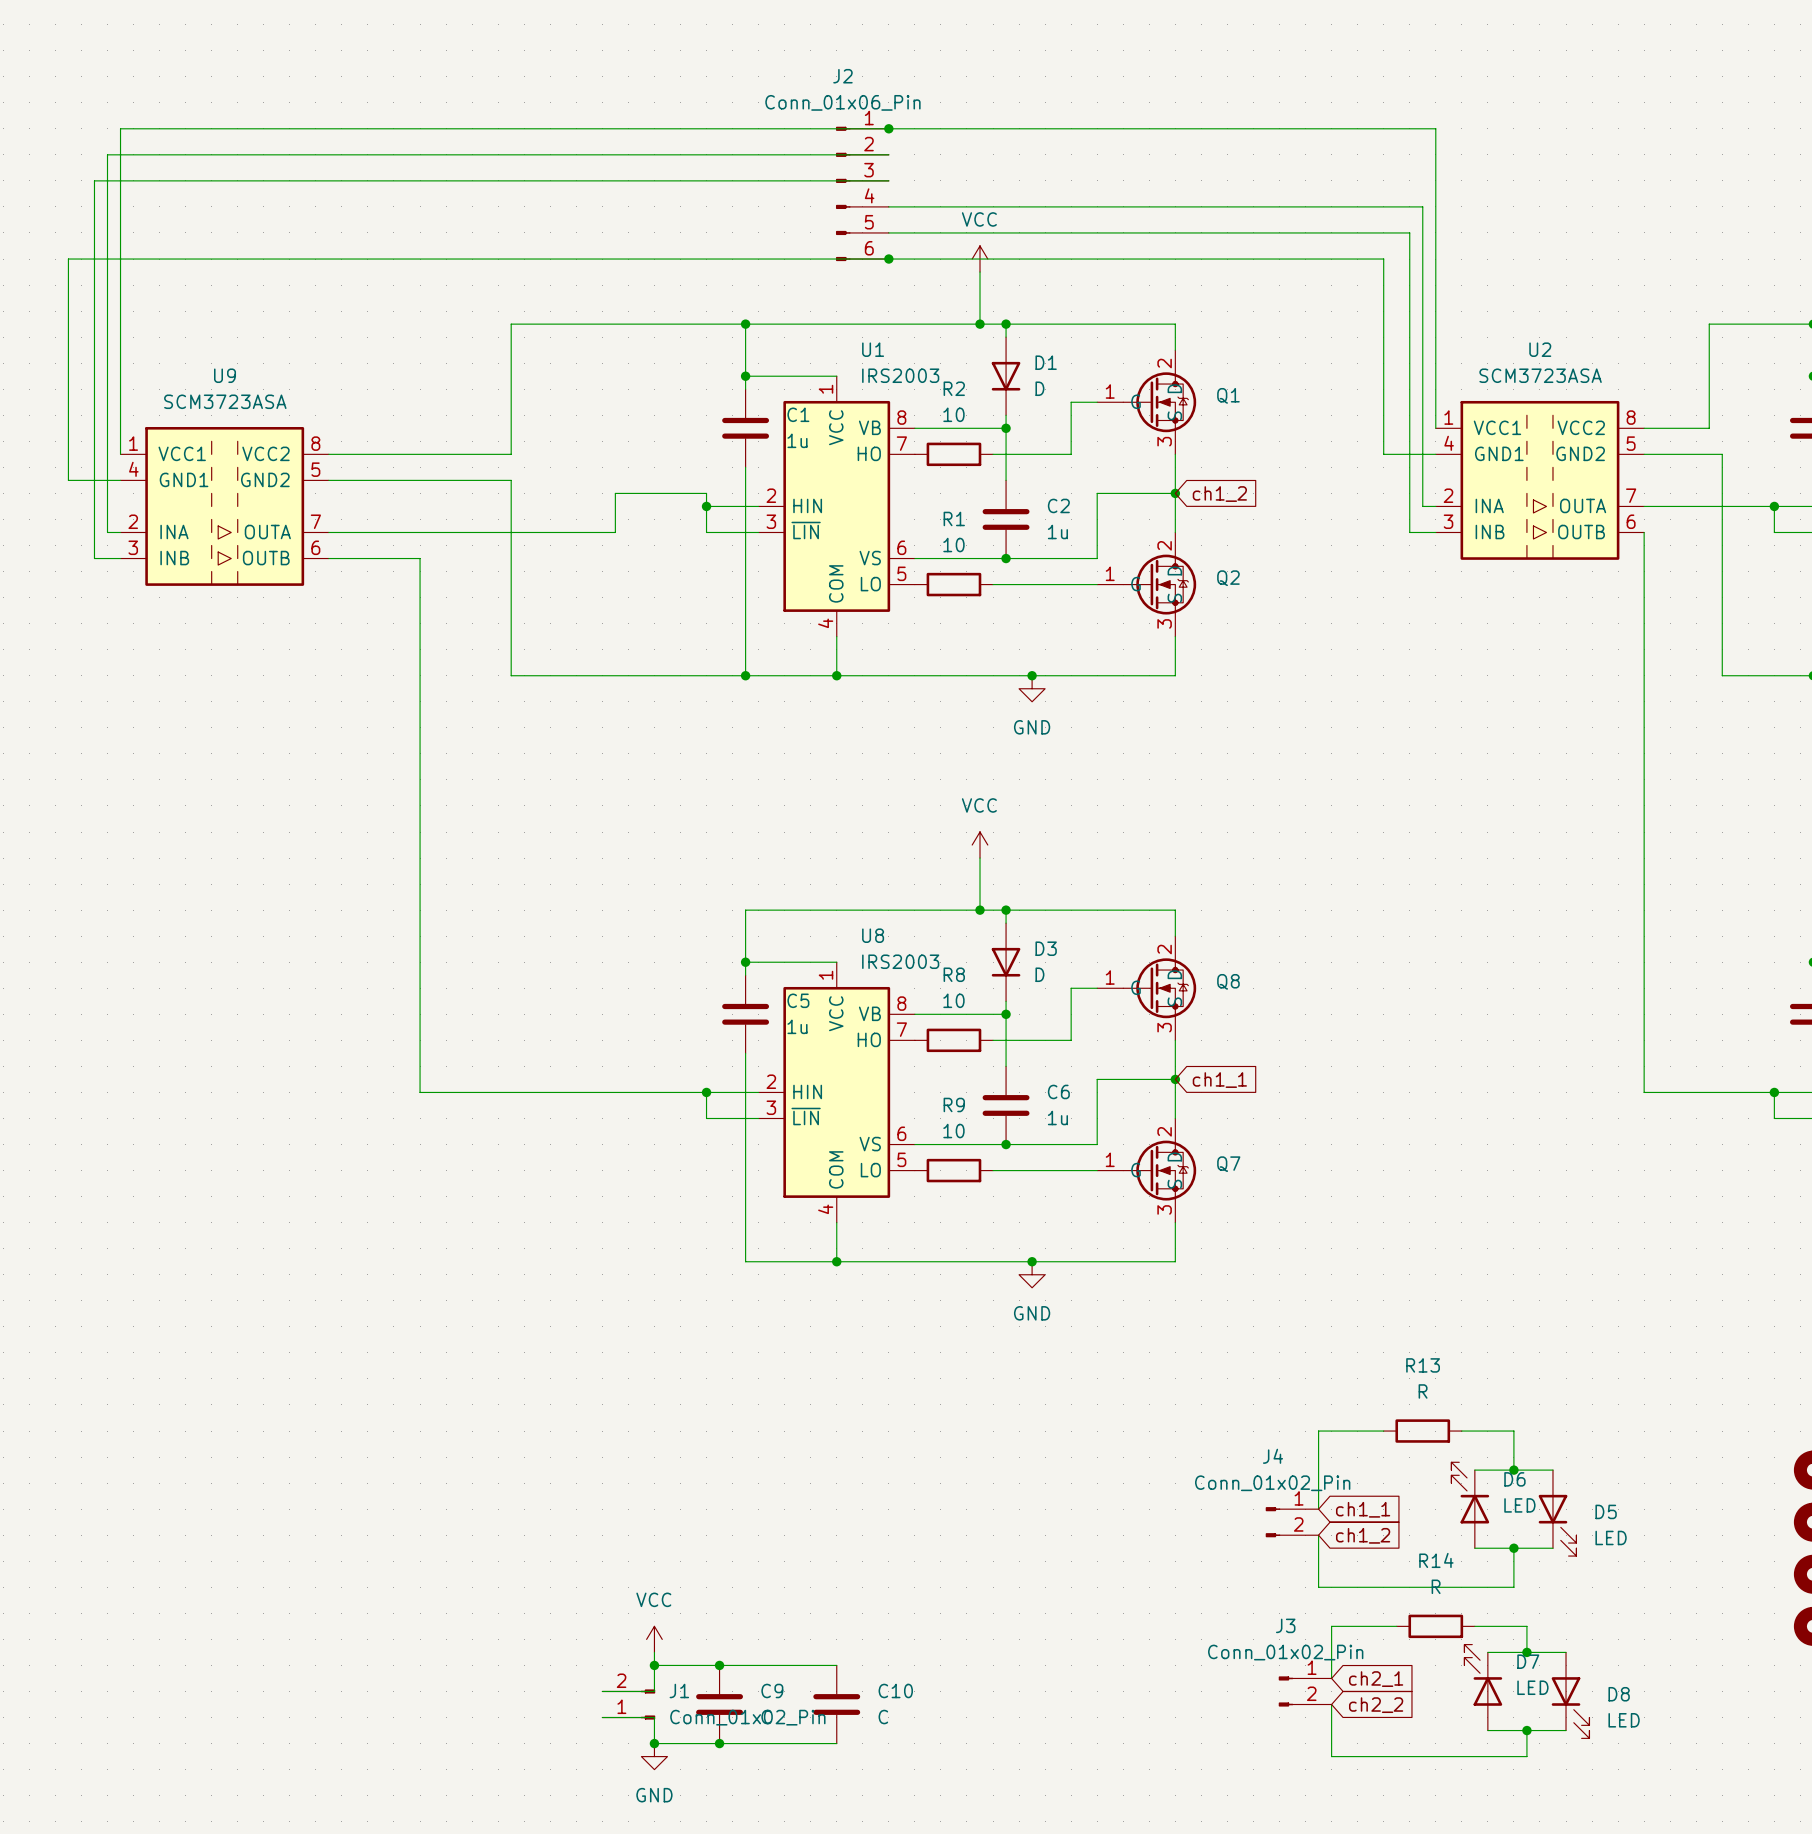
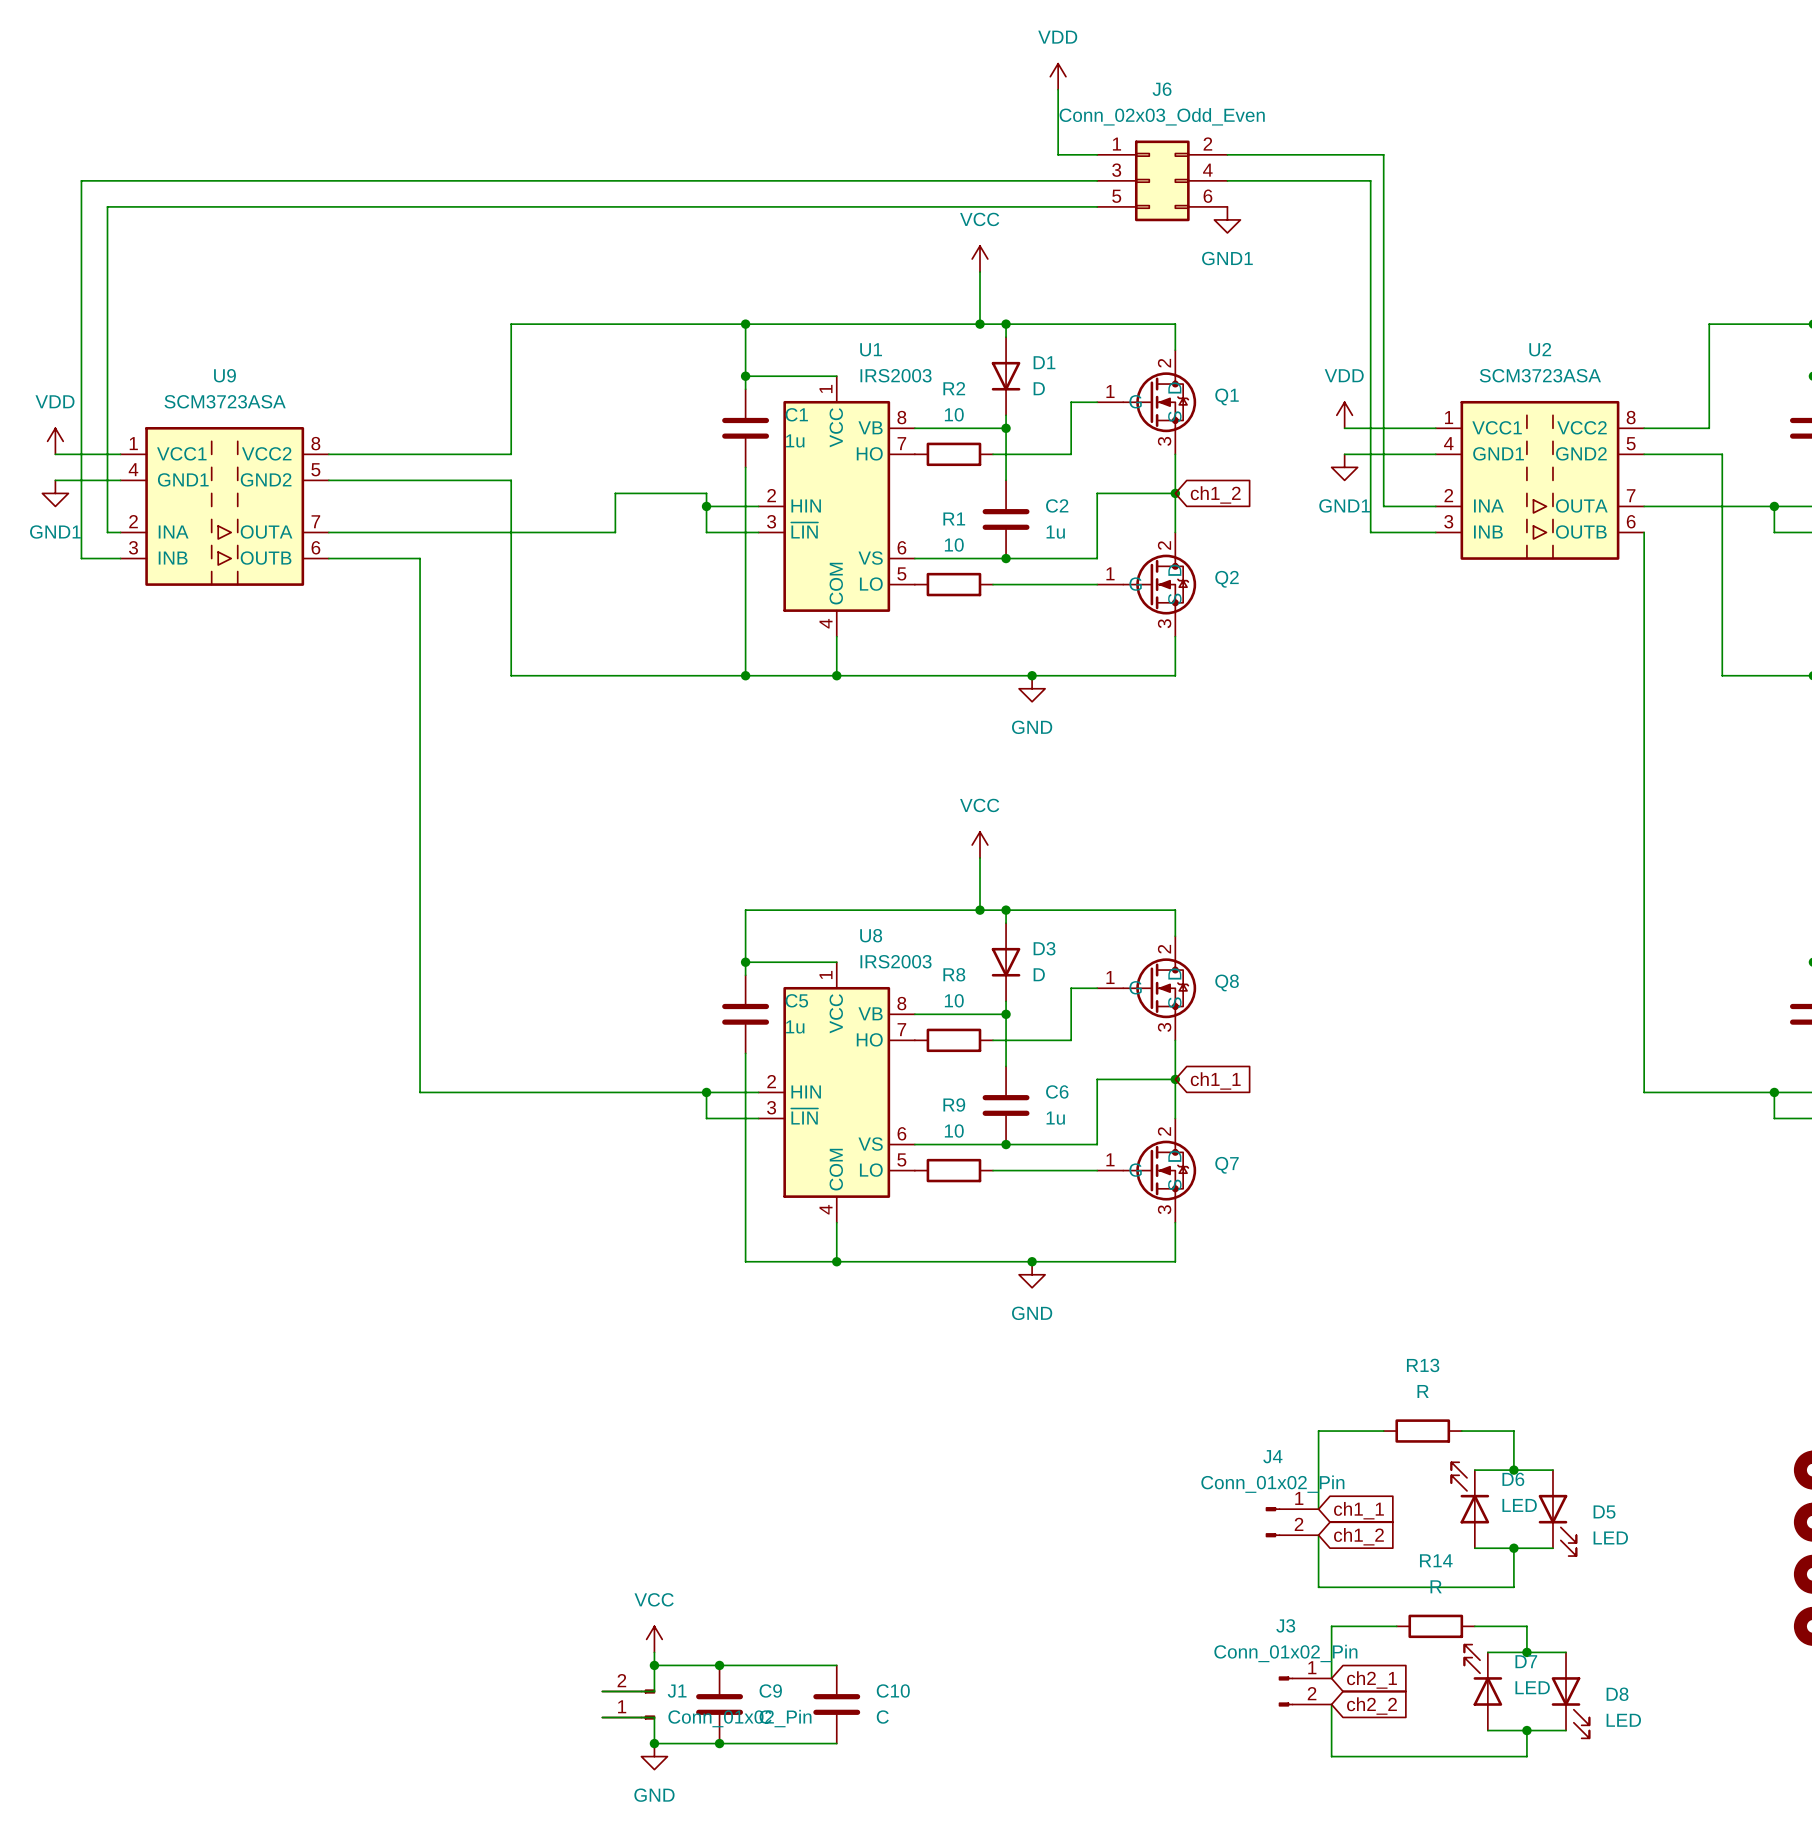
power symbol: none -> VDD (1058, 76)
wire: none -> (1058, 89) (1058, 154) (1097, 154)
junction: (888, 128) -> none
wire: (888, 154) (107, 154) (107, 206) -> (888, 206) (107, 206)
wire: (94, 180) (94, 558) -> (94, 180) (81, 180) (81, 558) (94, 558)
wire: none -> (888, 180) (1097, 180)
J6: none -> Conn_02x03_Odd_Even (1162, 180)
J2: Conn_01x06_Pin (862, 193) -> none
wire: (1097, 206) (1422, 206) (1422, 506) -> (1344, 454) (1383, 454) (1383, 506) (1422, 506)
power symbol: none -> GND1 (1227, 219)
wire: (888, 232) (1409, 232) (1409, 532) -> (1227, 180) (1370, 180) (1370, 532) (1409, 532)
junction: (888, 259) -> none
wire: (1383, 259) (68, 259) (68, 480) -> (1383, 259) (1383, 154) (1227, 154)
power symbol: none -> VDD (1344, 415)
wire: (1435, 428) (1435, 128) (120, 128) (120, 454) -> (1435, 428) (1344, 428)
power symbol: none -> VDD (55, 441)
wire: none -> (55, 454) (120, 454)
power symbol: none -> GND1 (1344, 467)
wire: none -> (55, 480) (68, 480)
power symbol: none -> GND1 (55, 493)

